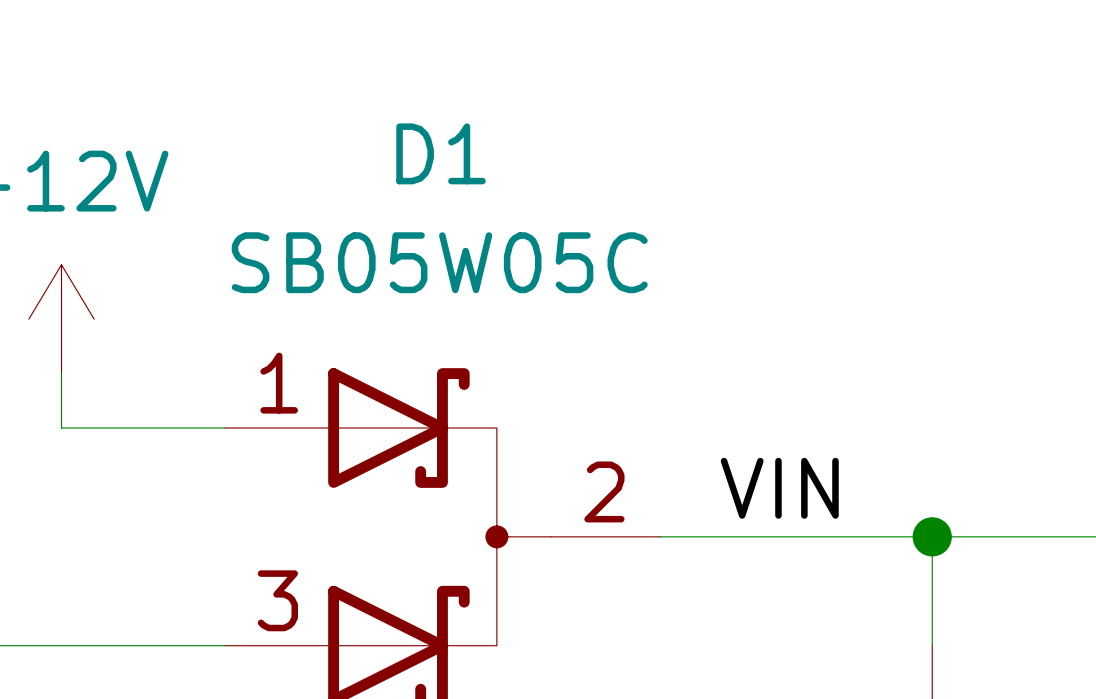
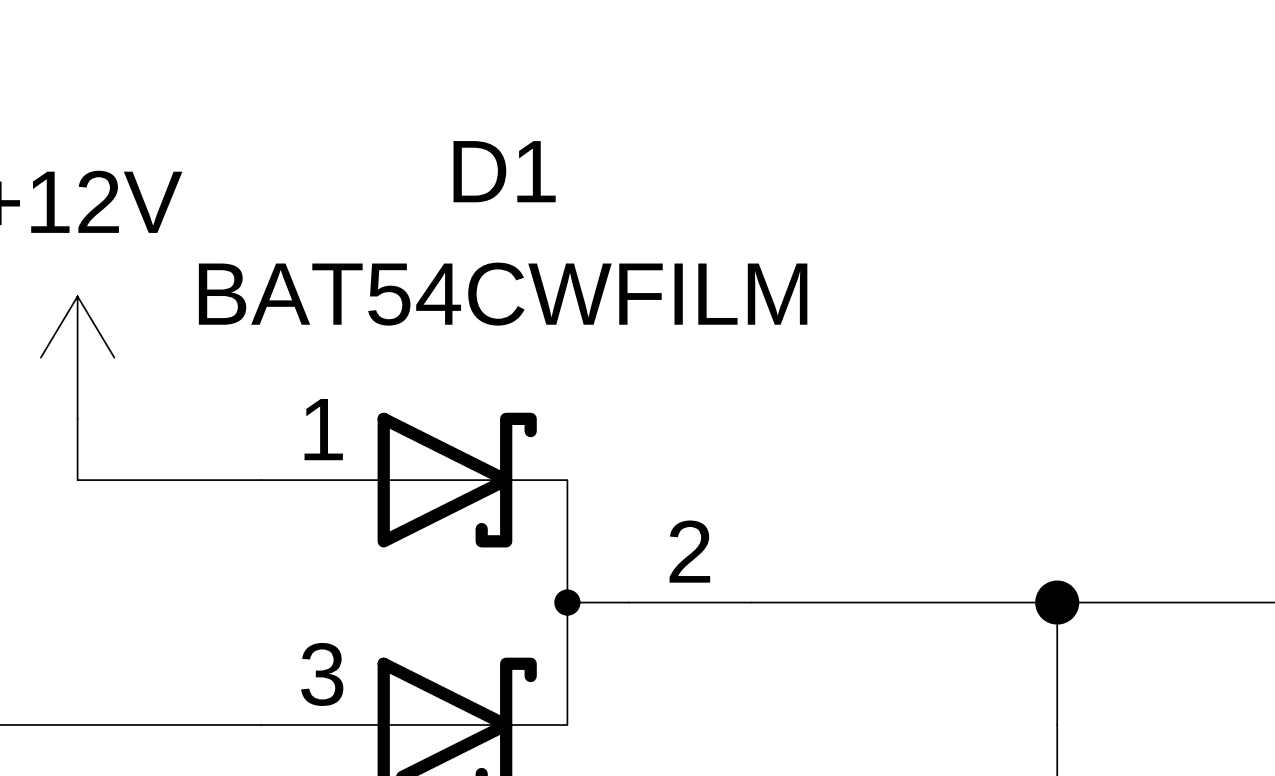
D1 value: SB05W05C (439, 262) -> BAT54CWFILM (503, 294)
label: VIN (779, 488) -> none

